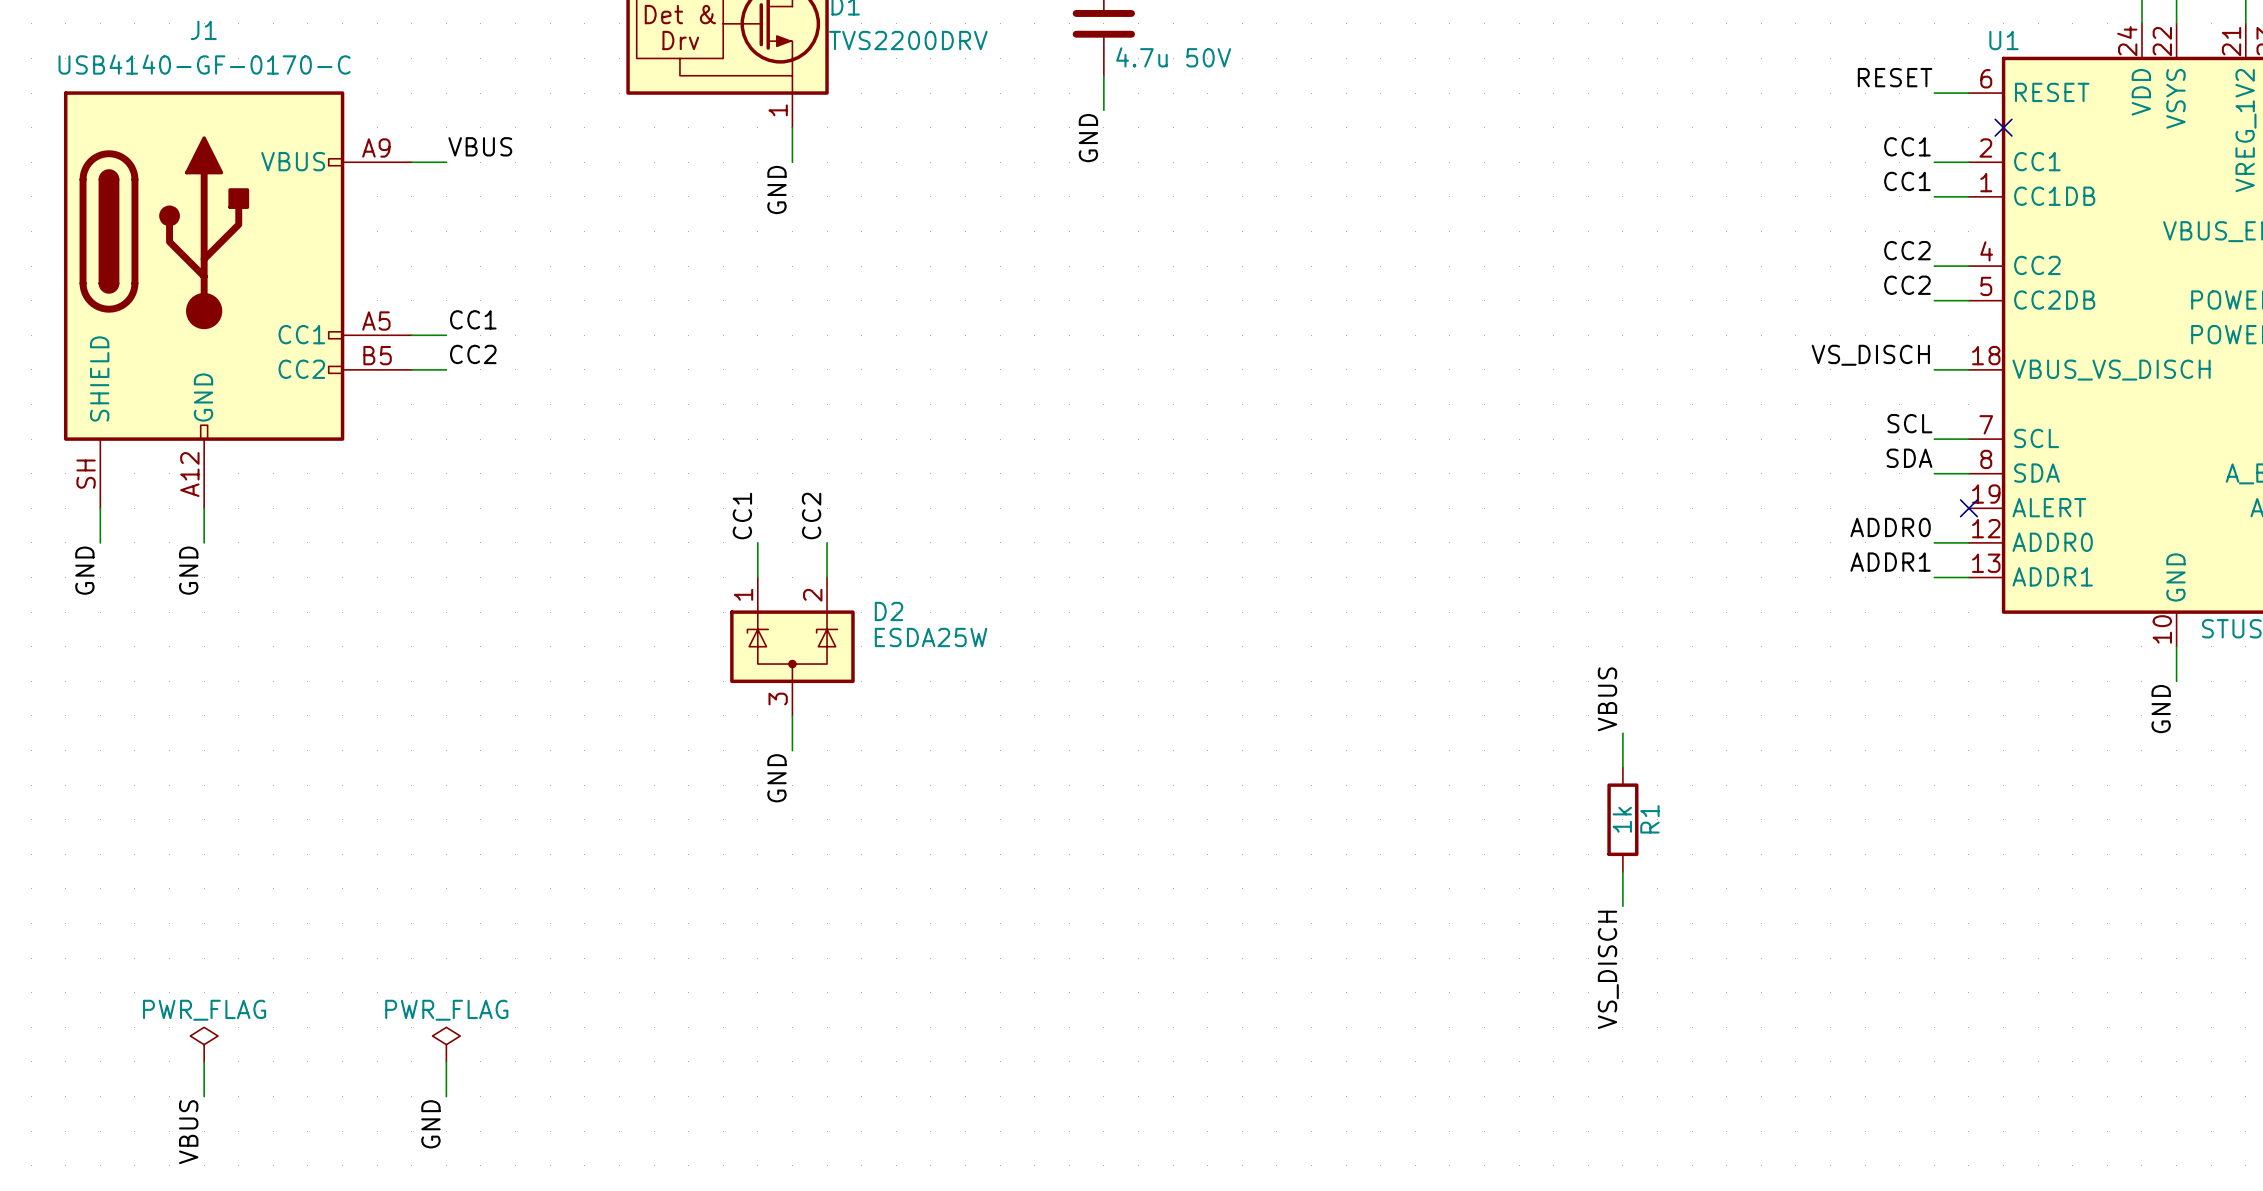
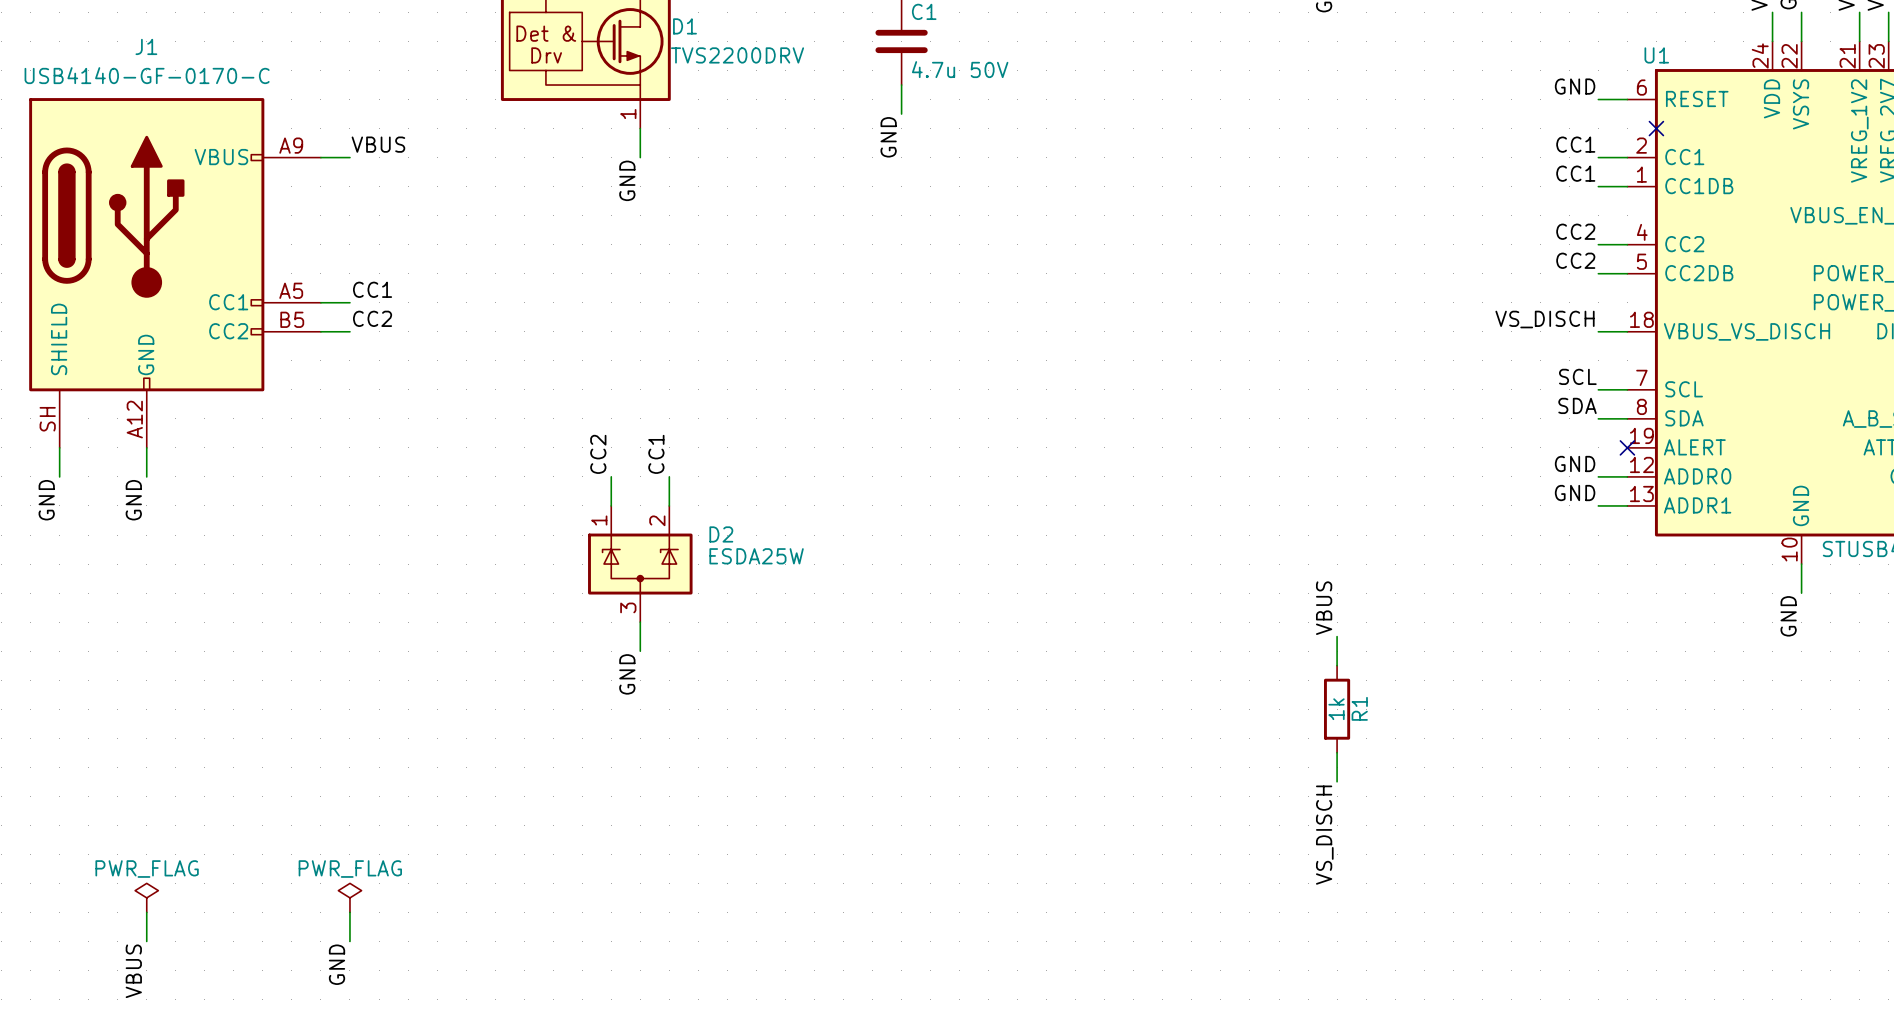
label: RESET (1895, 77) -> GND (1575, 86)
label: CC1 (742, 516) -> CC2 (598, 454)
label: CC2 (811, 516) -> CC1 (656, 454)
label: ADDR0 (1890, 527) -> GND (1575, 463)
label: ADDR1 (1890, 562) -> GND (1575, 493)

